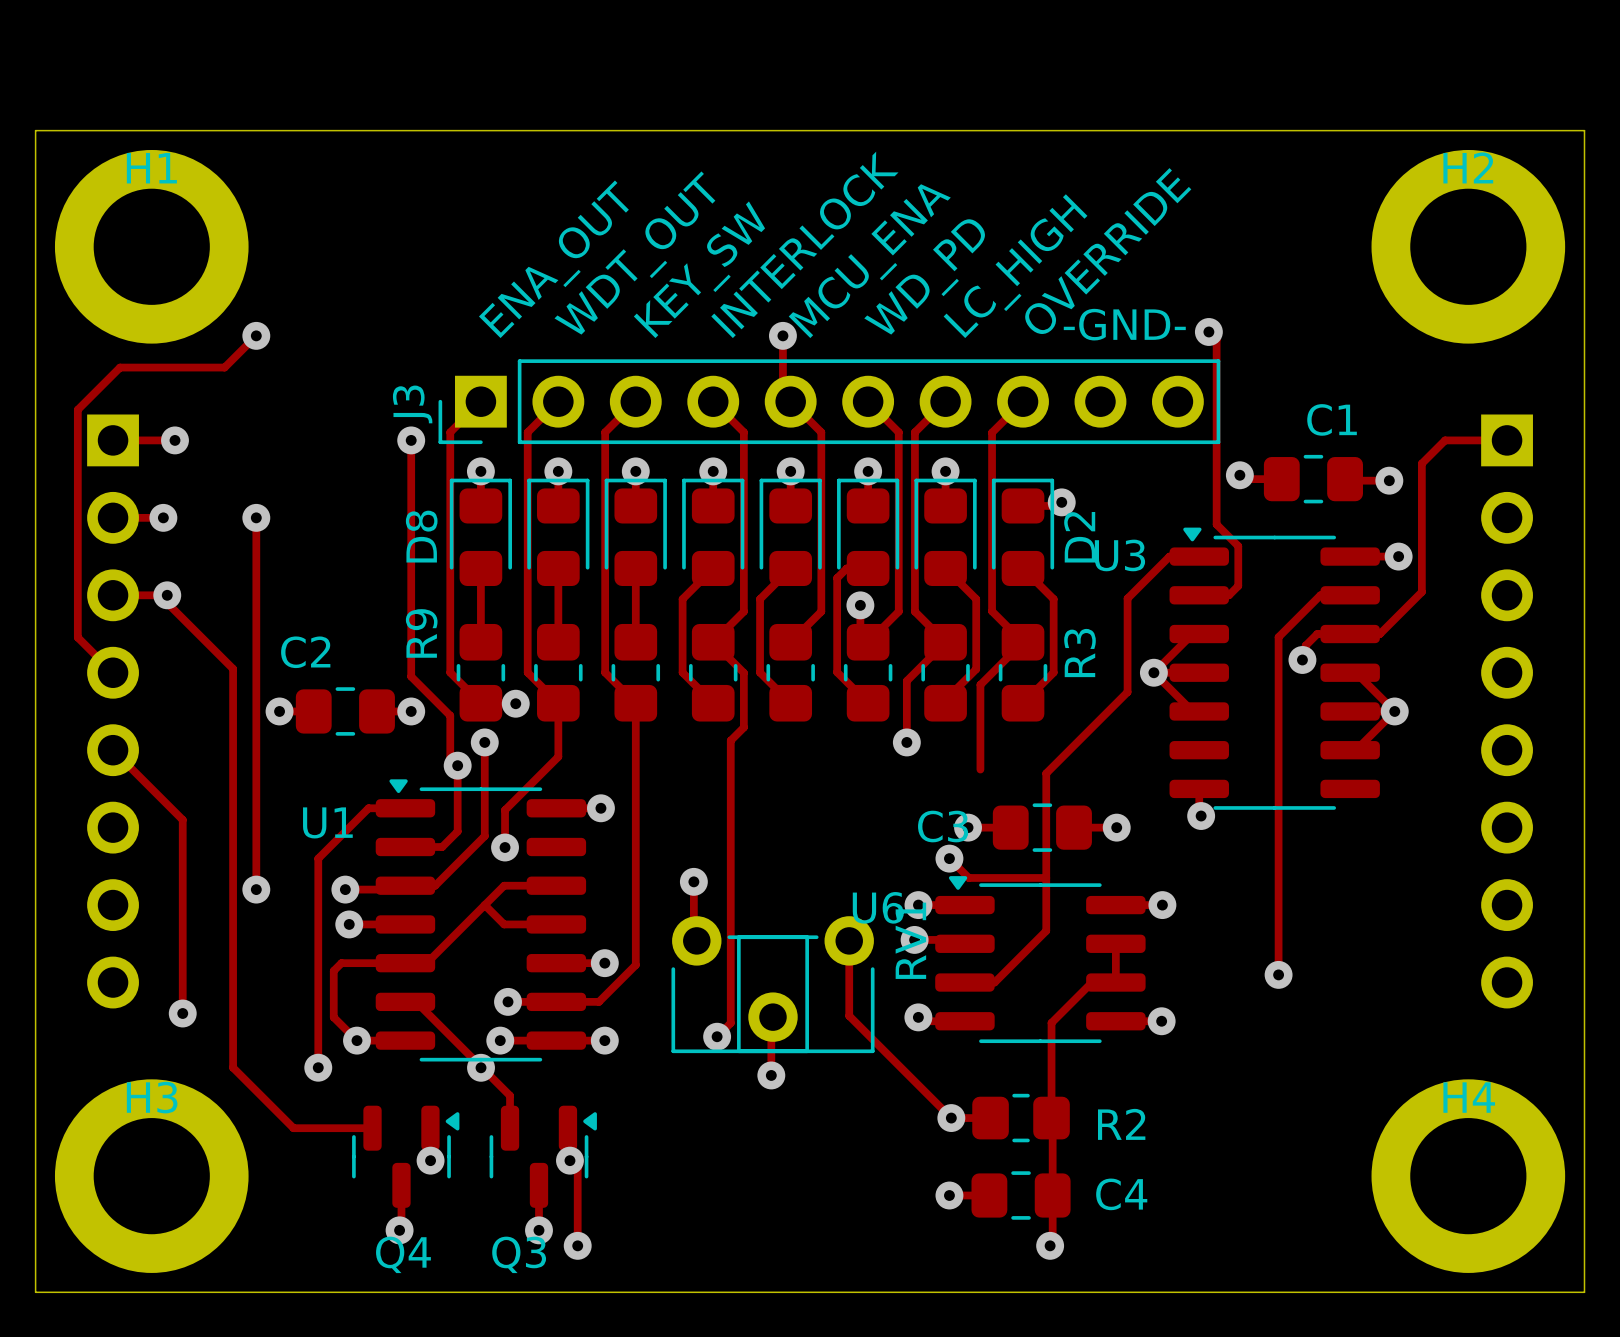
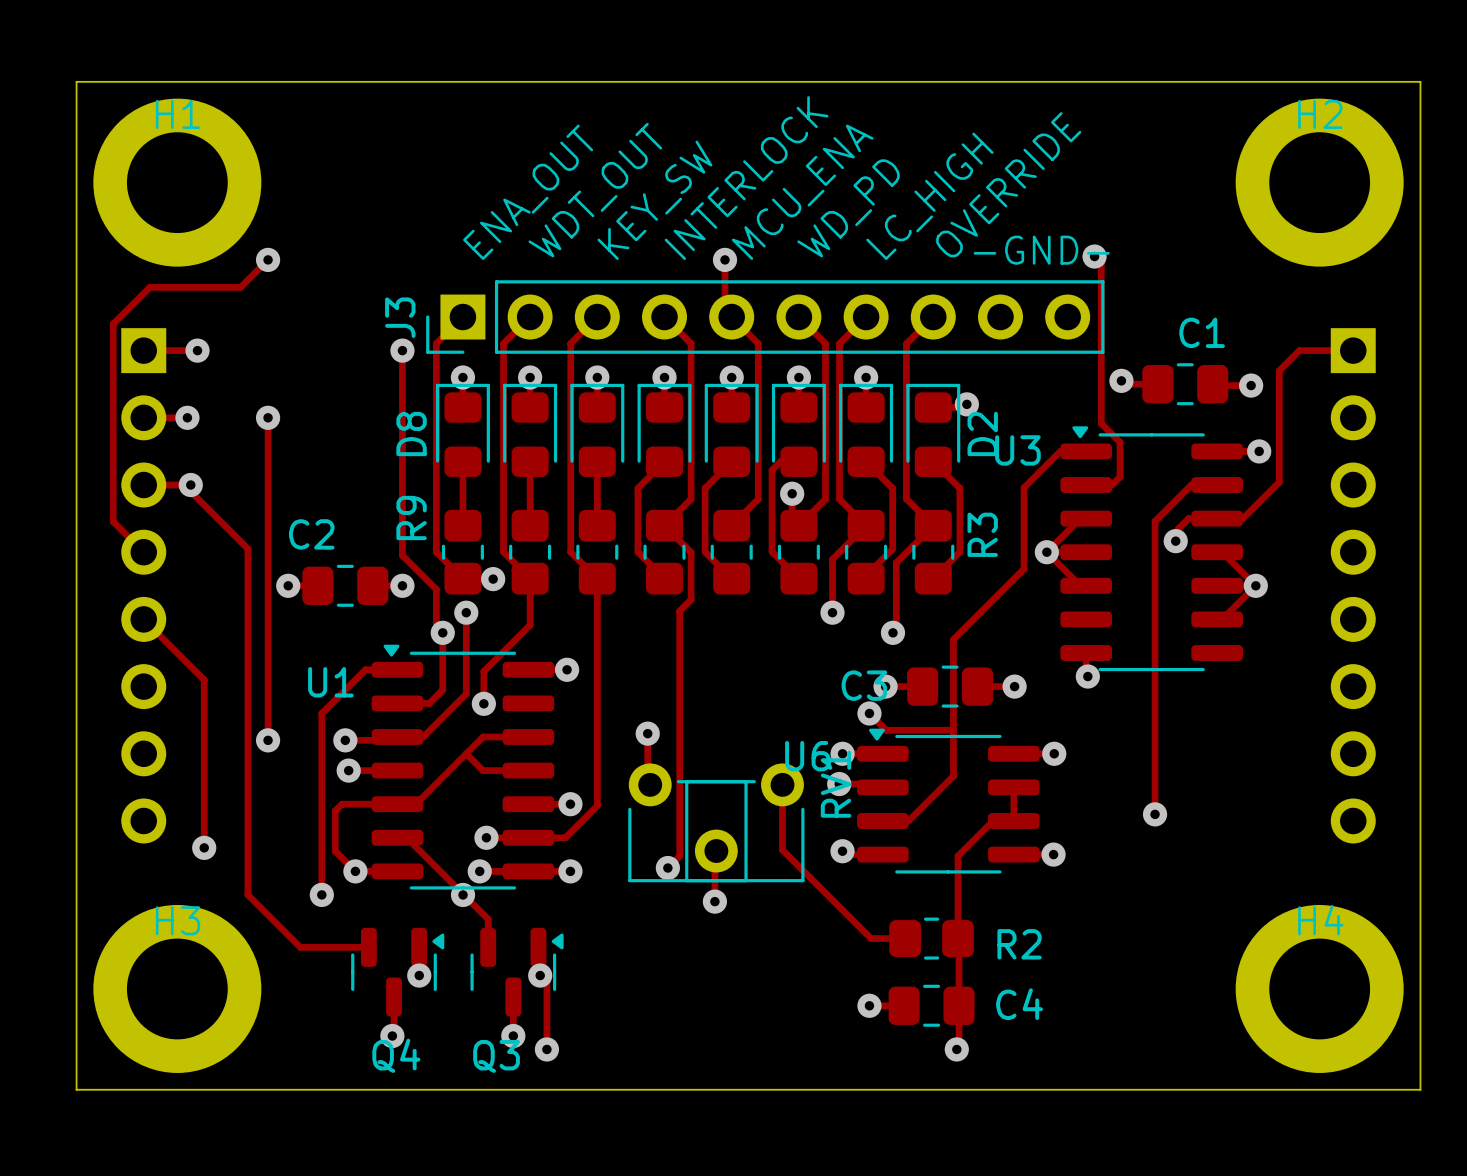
via: none -> (892, 632)
via: (951, 1118) -> none

